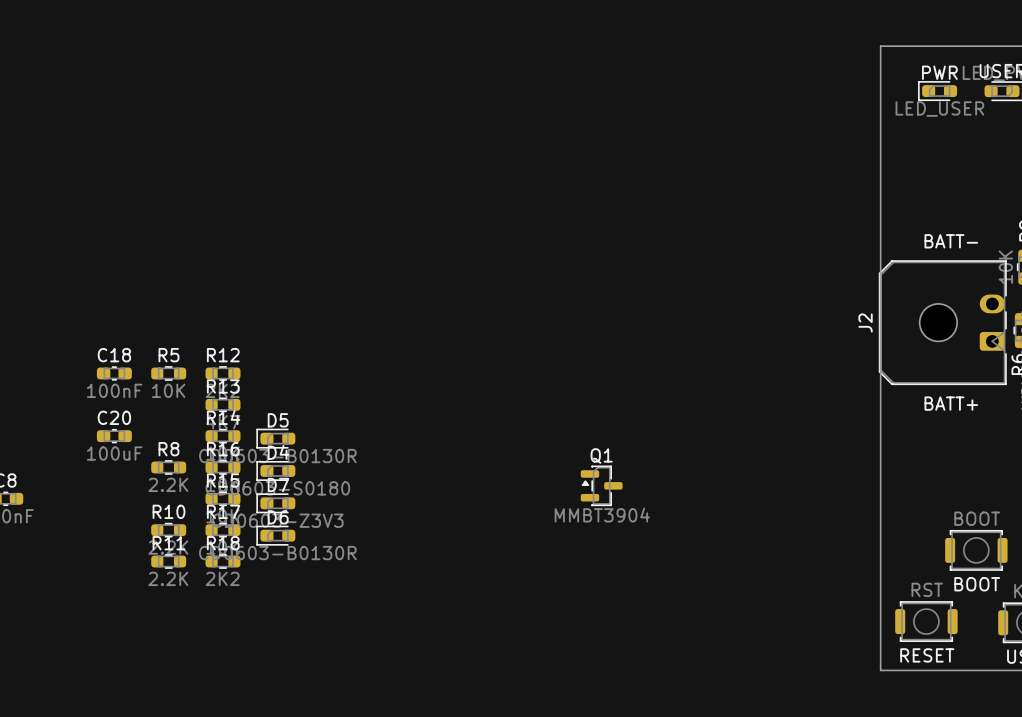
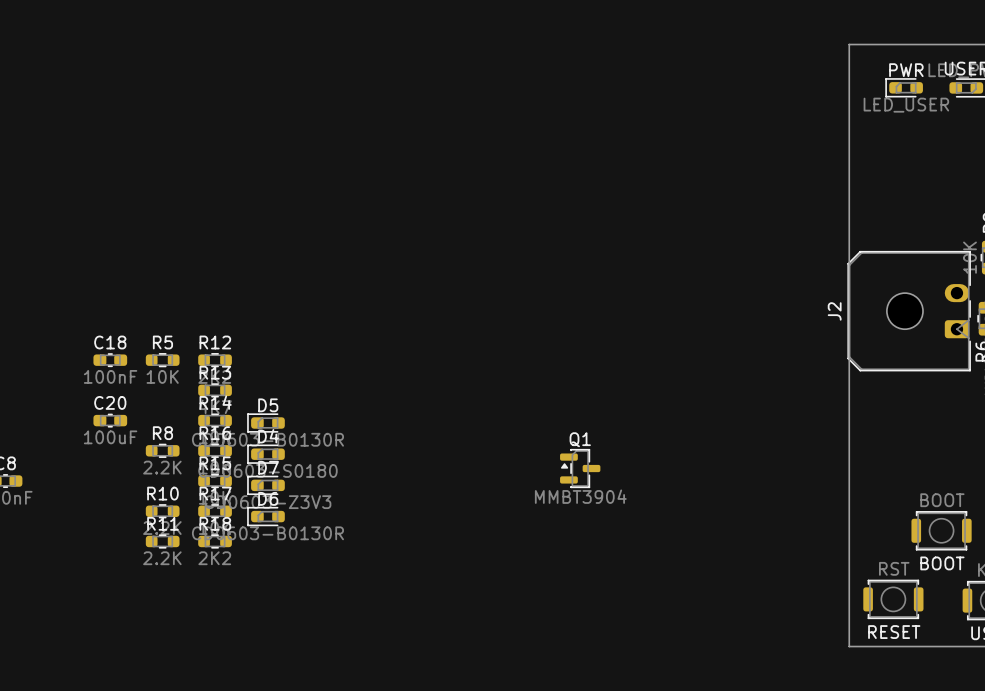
text: BATT- (951, 241) -> none
text: BATT+ (951, 403) -> none

